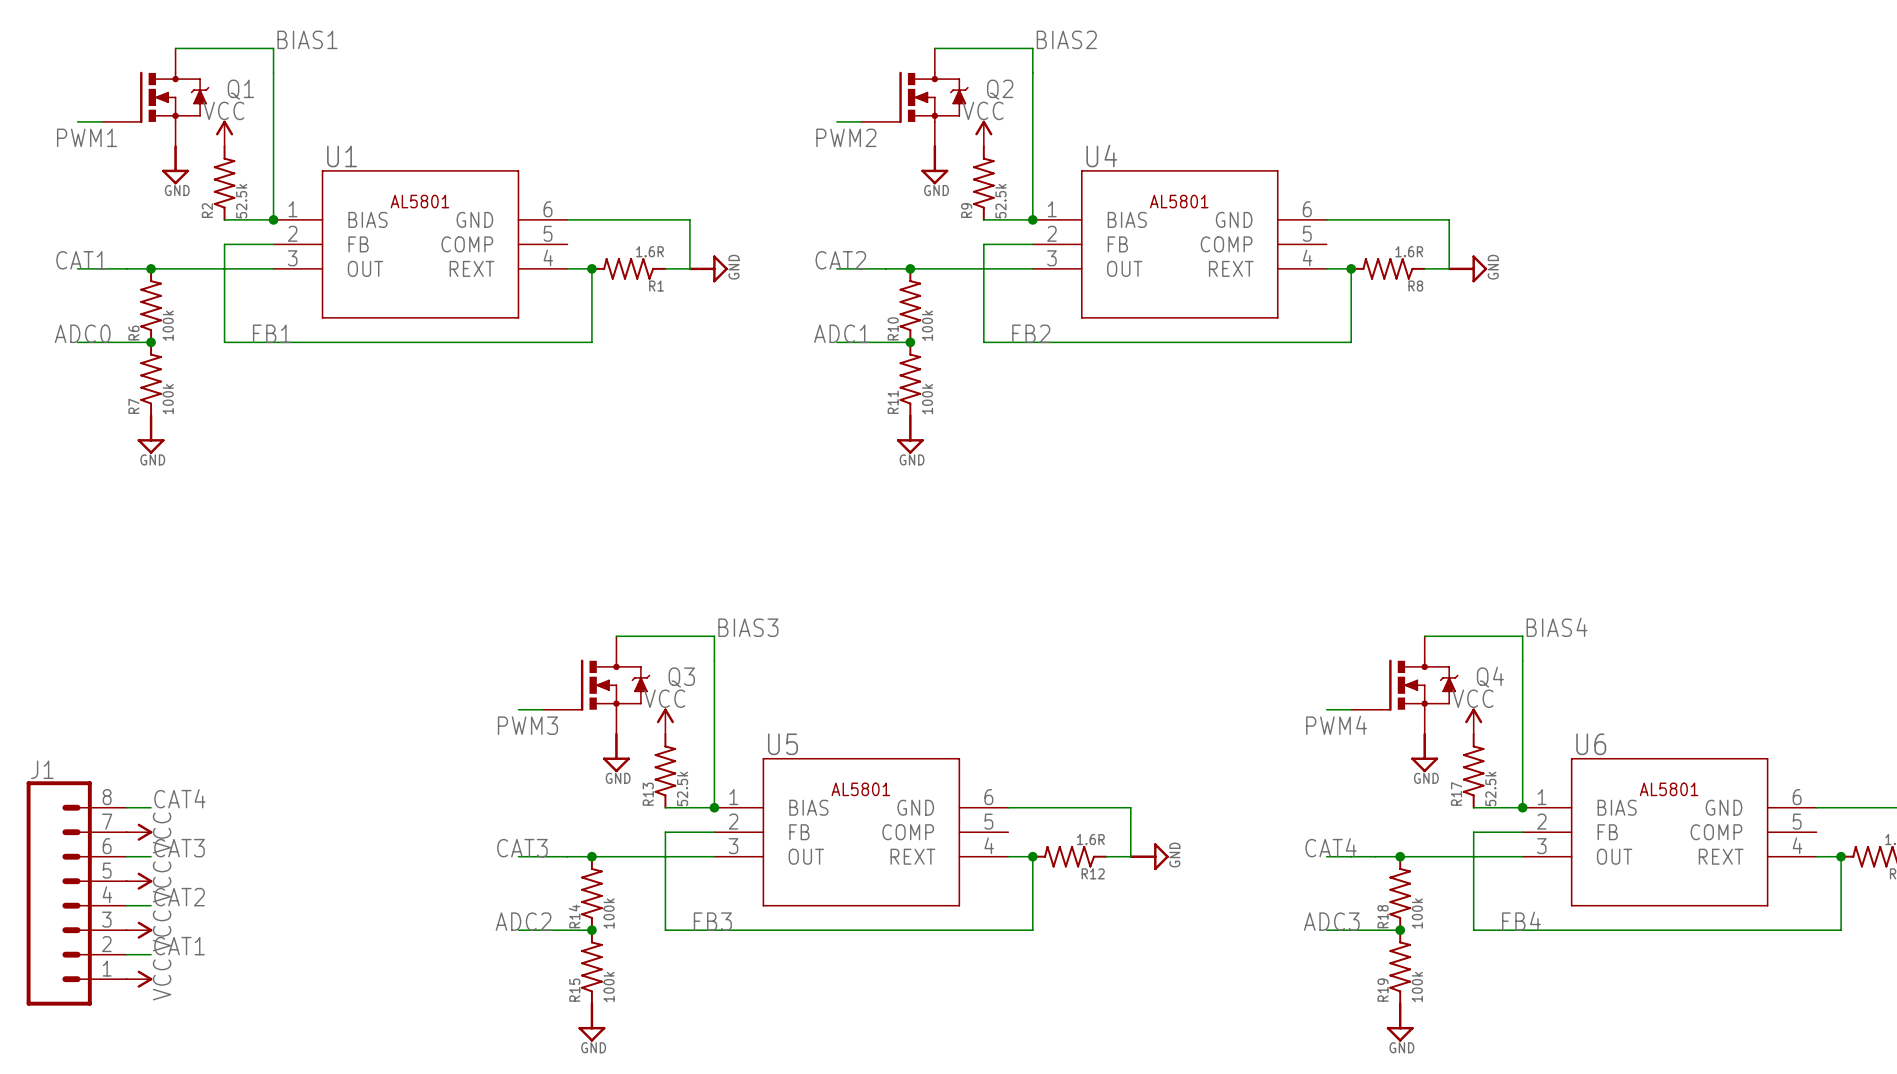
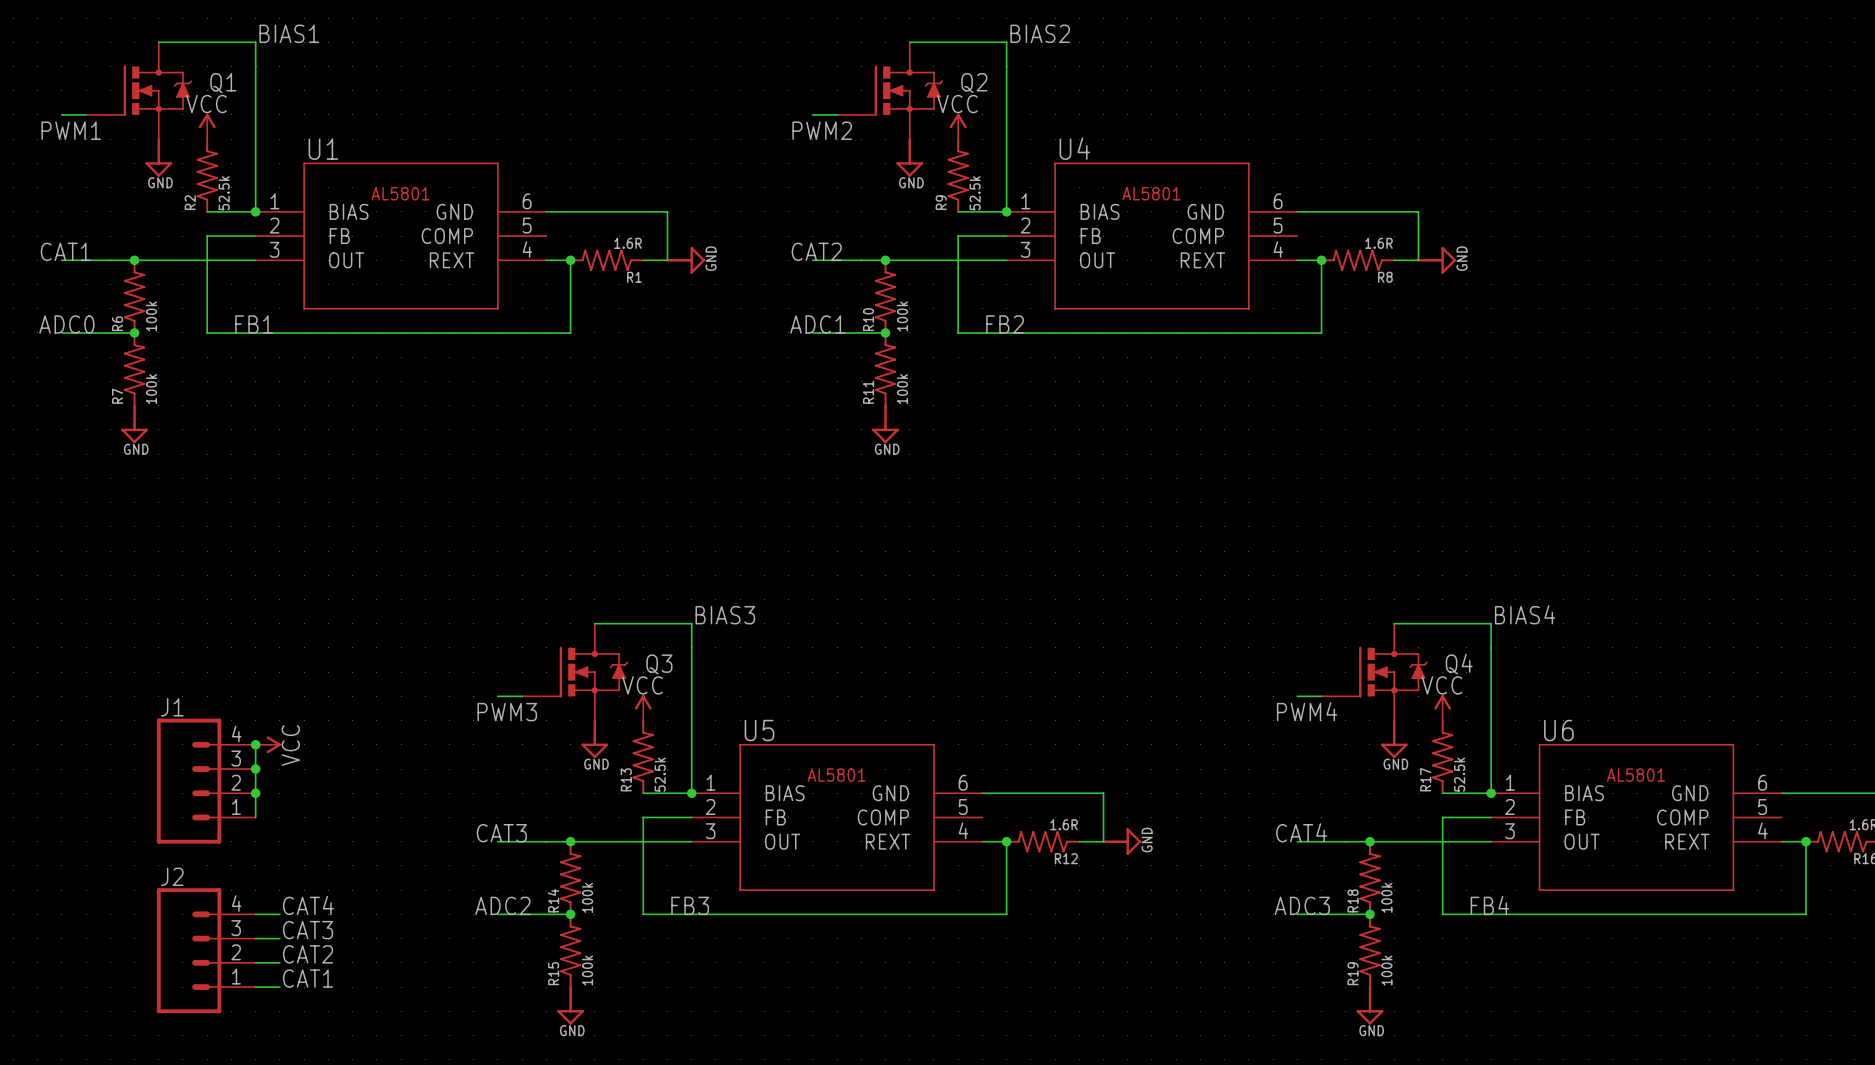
wire: none -> (255, 744) (255, 817)
junction: none -> (255, 744)
power symbol: none -> VCC (268, 744)
J1 name position: J1 (42, 769) -> J1 (172, 707)
J1 symbol: [26, 781, 127, 1006] -> [156, 718, 256, 844]
junction: none -> (255, 769)
label position: CAT4 (179, 798) -> CAT4 (308, 905)
wire: (126, 807) (151, 807) -> none
junction: none -> (255, 793)
power symbol: VCC (139, 832) -> none
label position: CAT3 (179, 848) -> CAT3 (308, 930)
wire: (126, 856) (151, 856) -> (255, 938) (279, 938)
power symbol: VCC (139, 881) -> none
label position: CAT2 (179, 897) -> CAT2 (308, 954)
wire: (126, 905) (151, 905) -> (255, 914) (279, 914)
power symbol: VCC (139, 930) -> none
label position: CAT1 (179, 946) -> CAT1 (308, 978)
wire: (126, 954) (151, 954) -> (255, 962) (279, 962)
J2: none -> (206, 950)
power symbol: VCC (139, 979) -> none
wire: none -> (255, 987) (279, 987)

